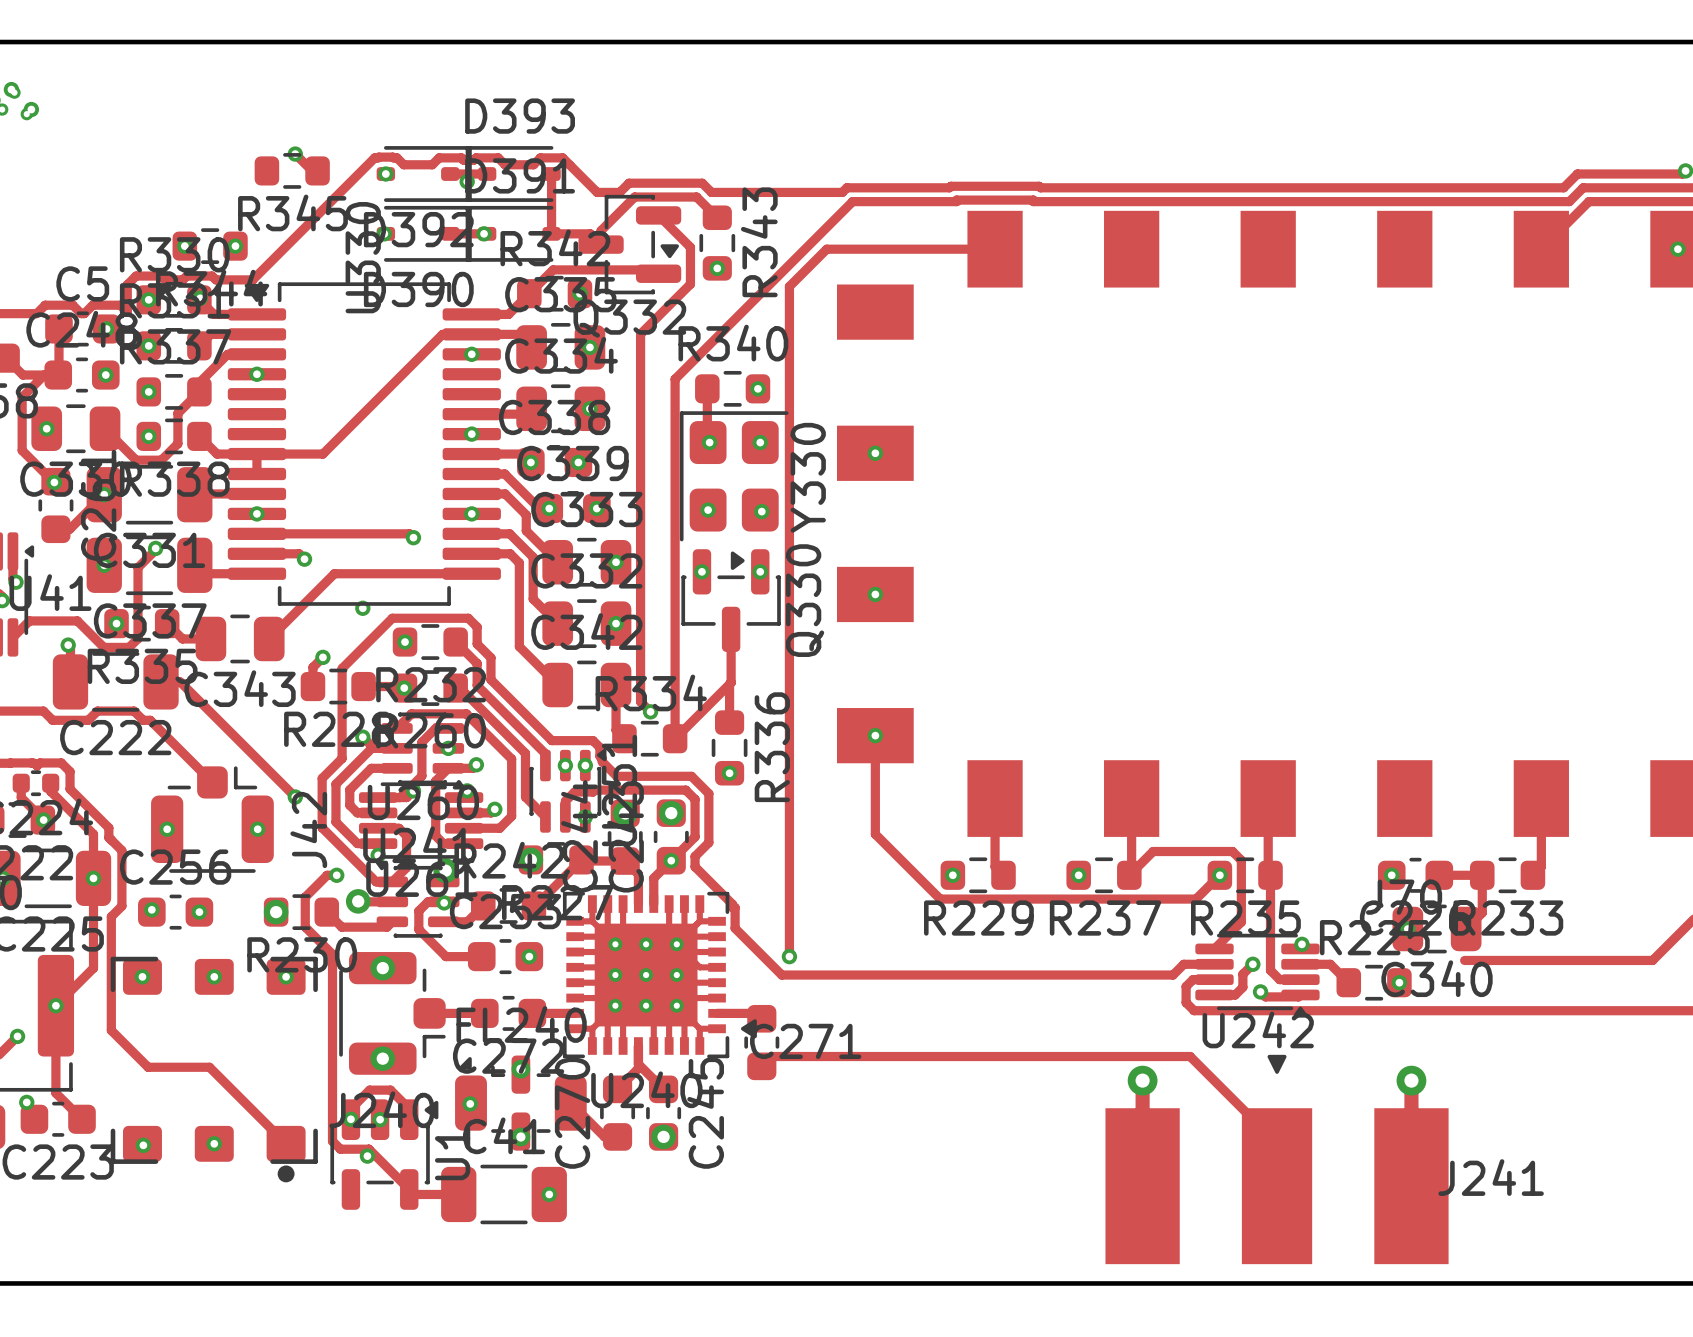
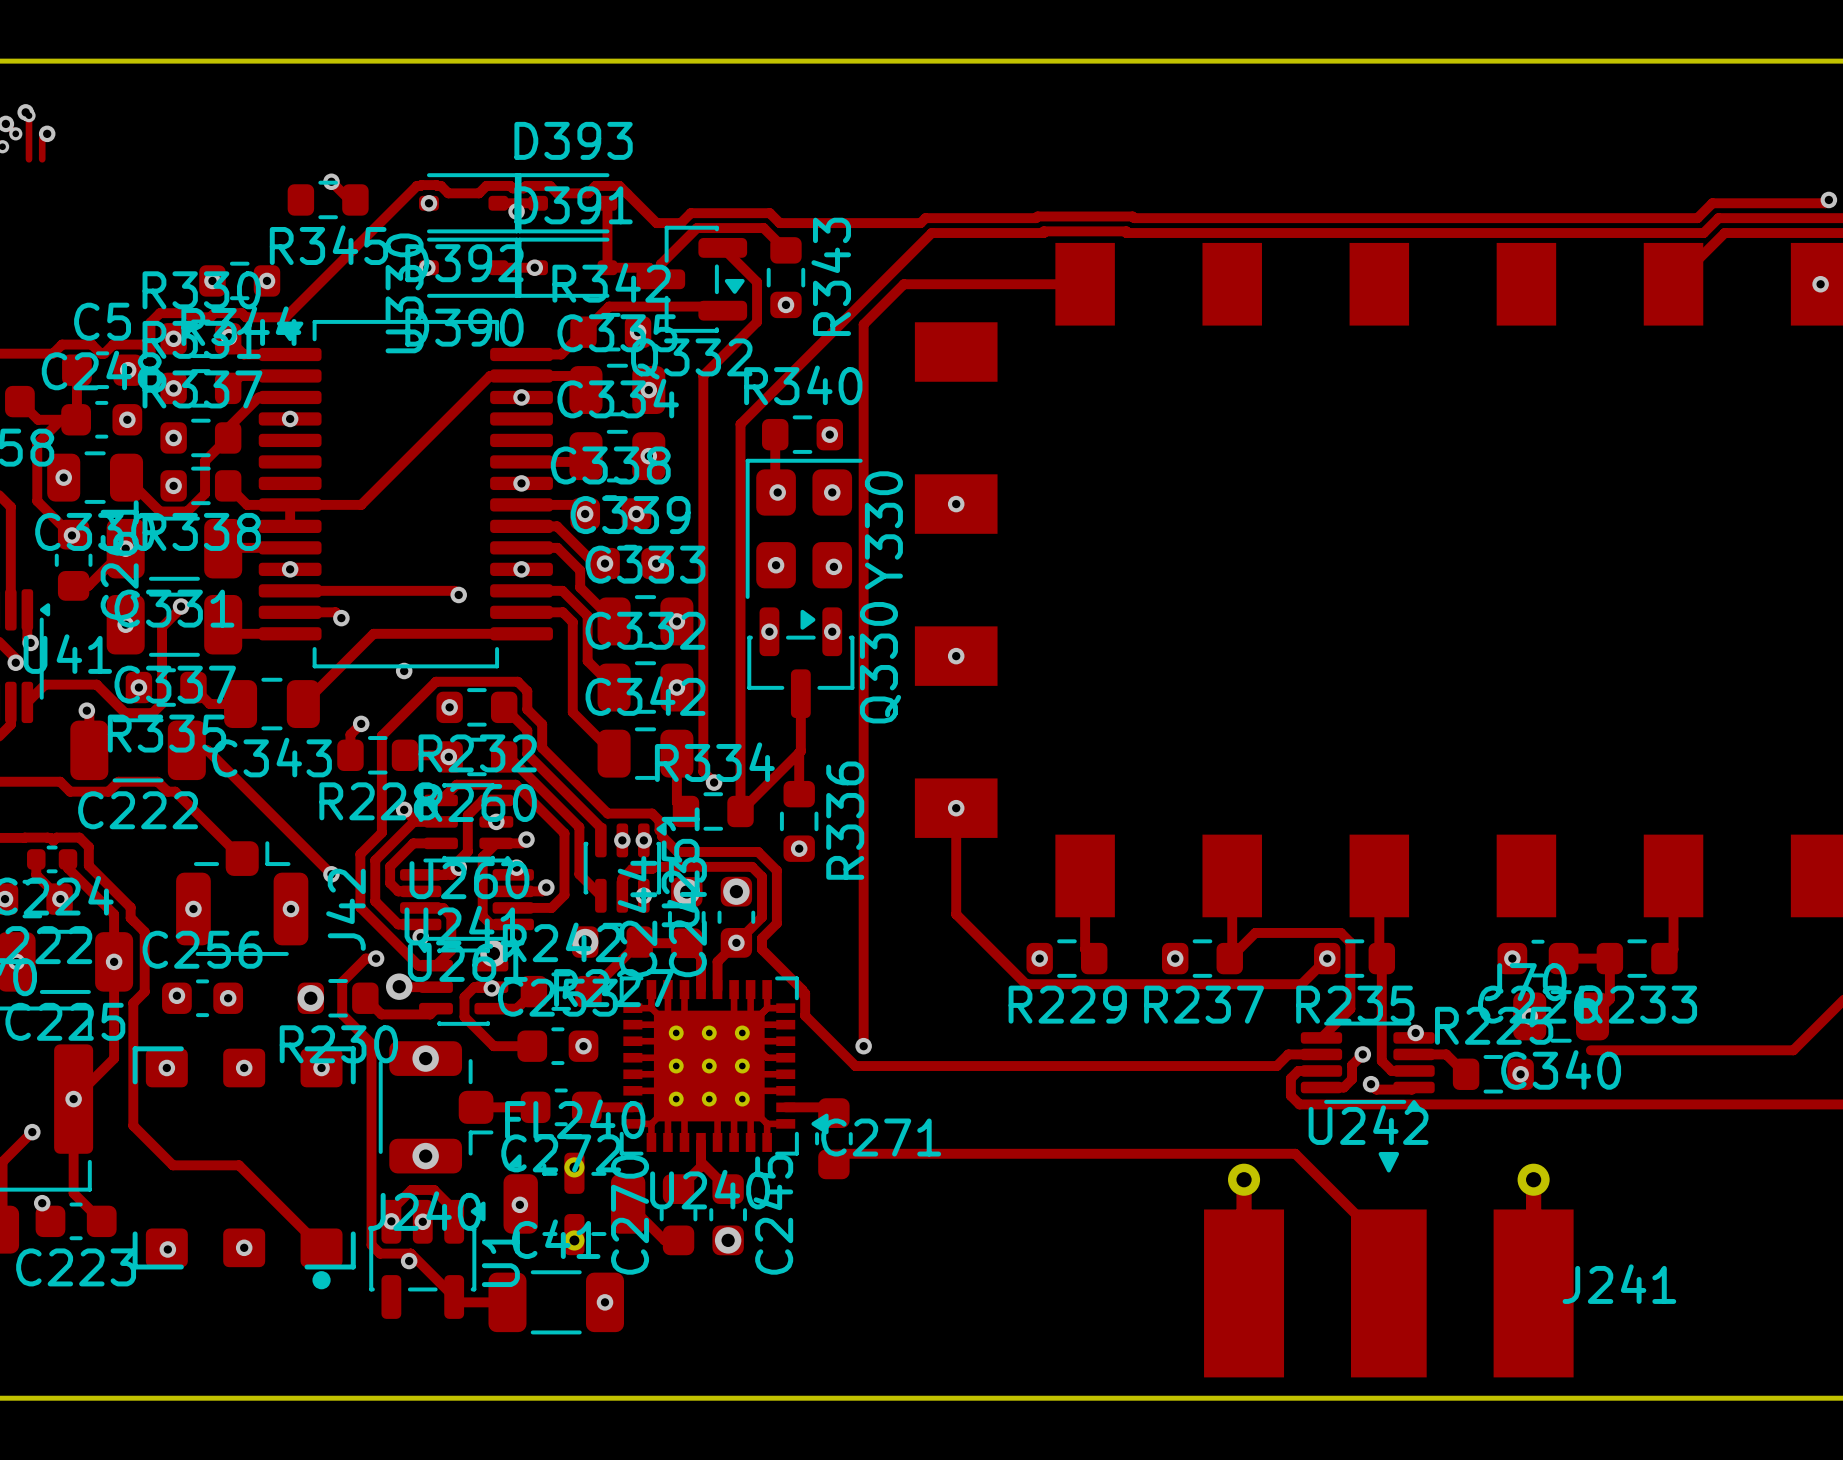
track: none -> (29, 115) (29, 159)
track: none -> (42, 138) (42, 159)
via: (26, 114) -> none

